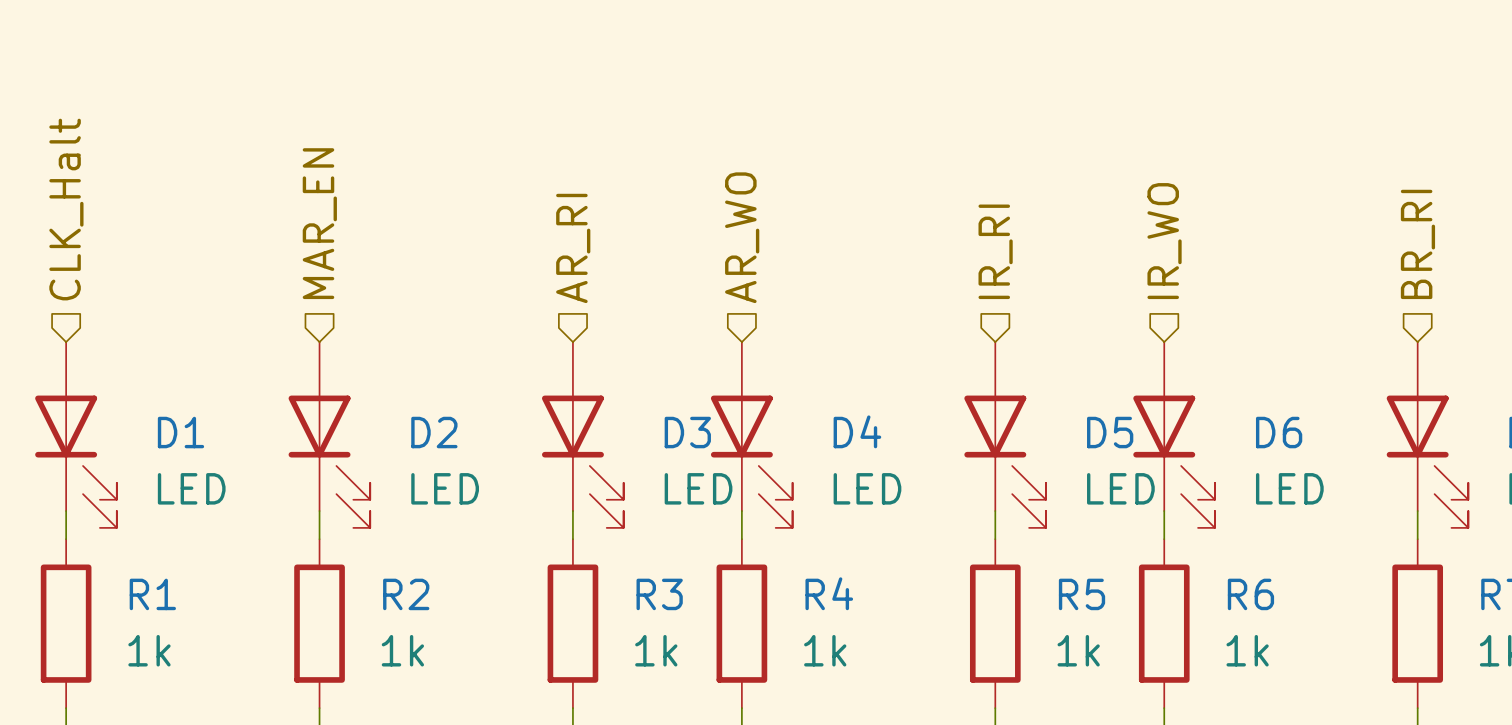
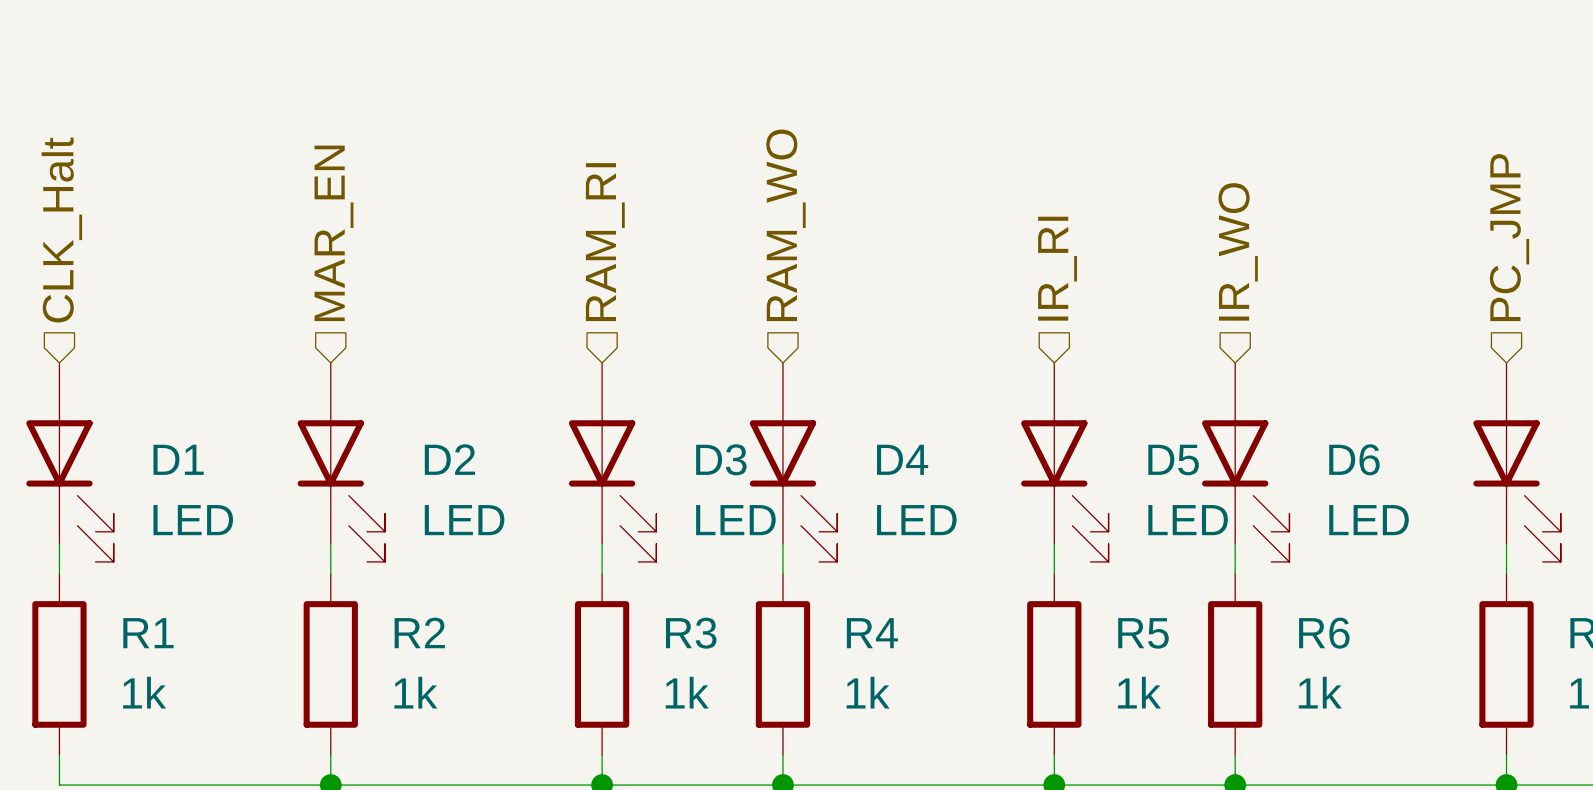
hierarchical label: AR_WO (742, 237) -> RAM_WO (785, 225)
hierarchical label: BR_RI (1417, 244) -> PC_JMP (1509, 237)
hierarchical label: AR_RI (573, 248) -> RAM_RI (605, 242)

